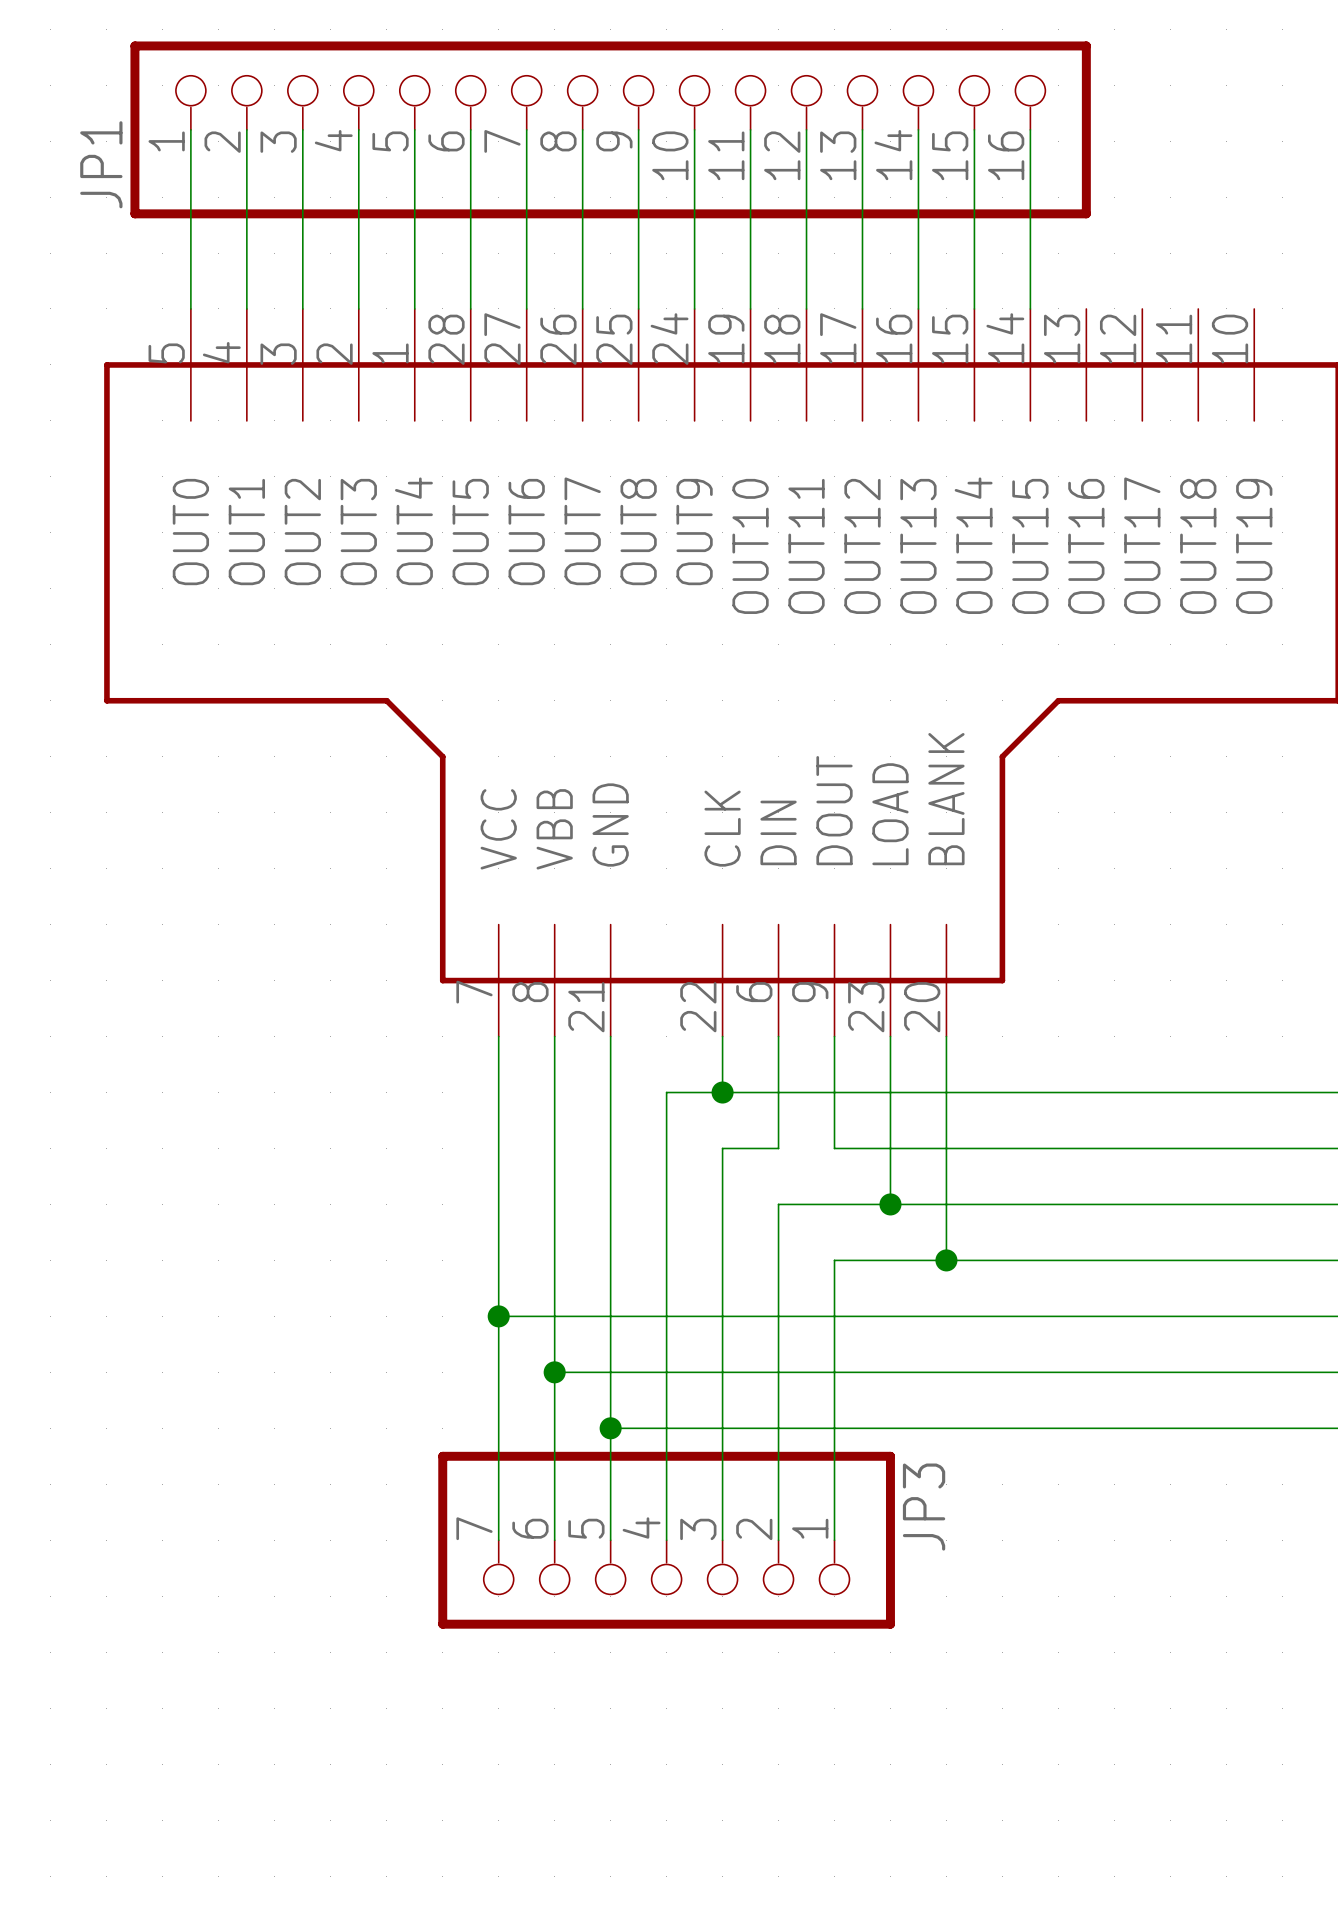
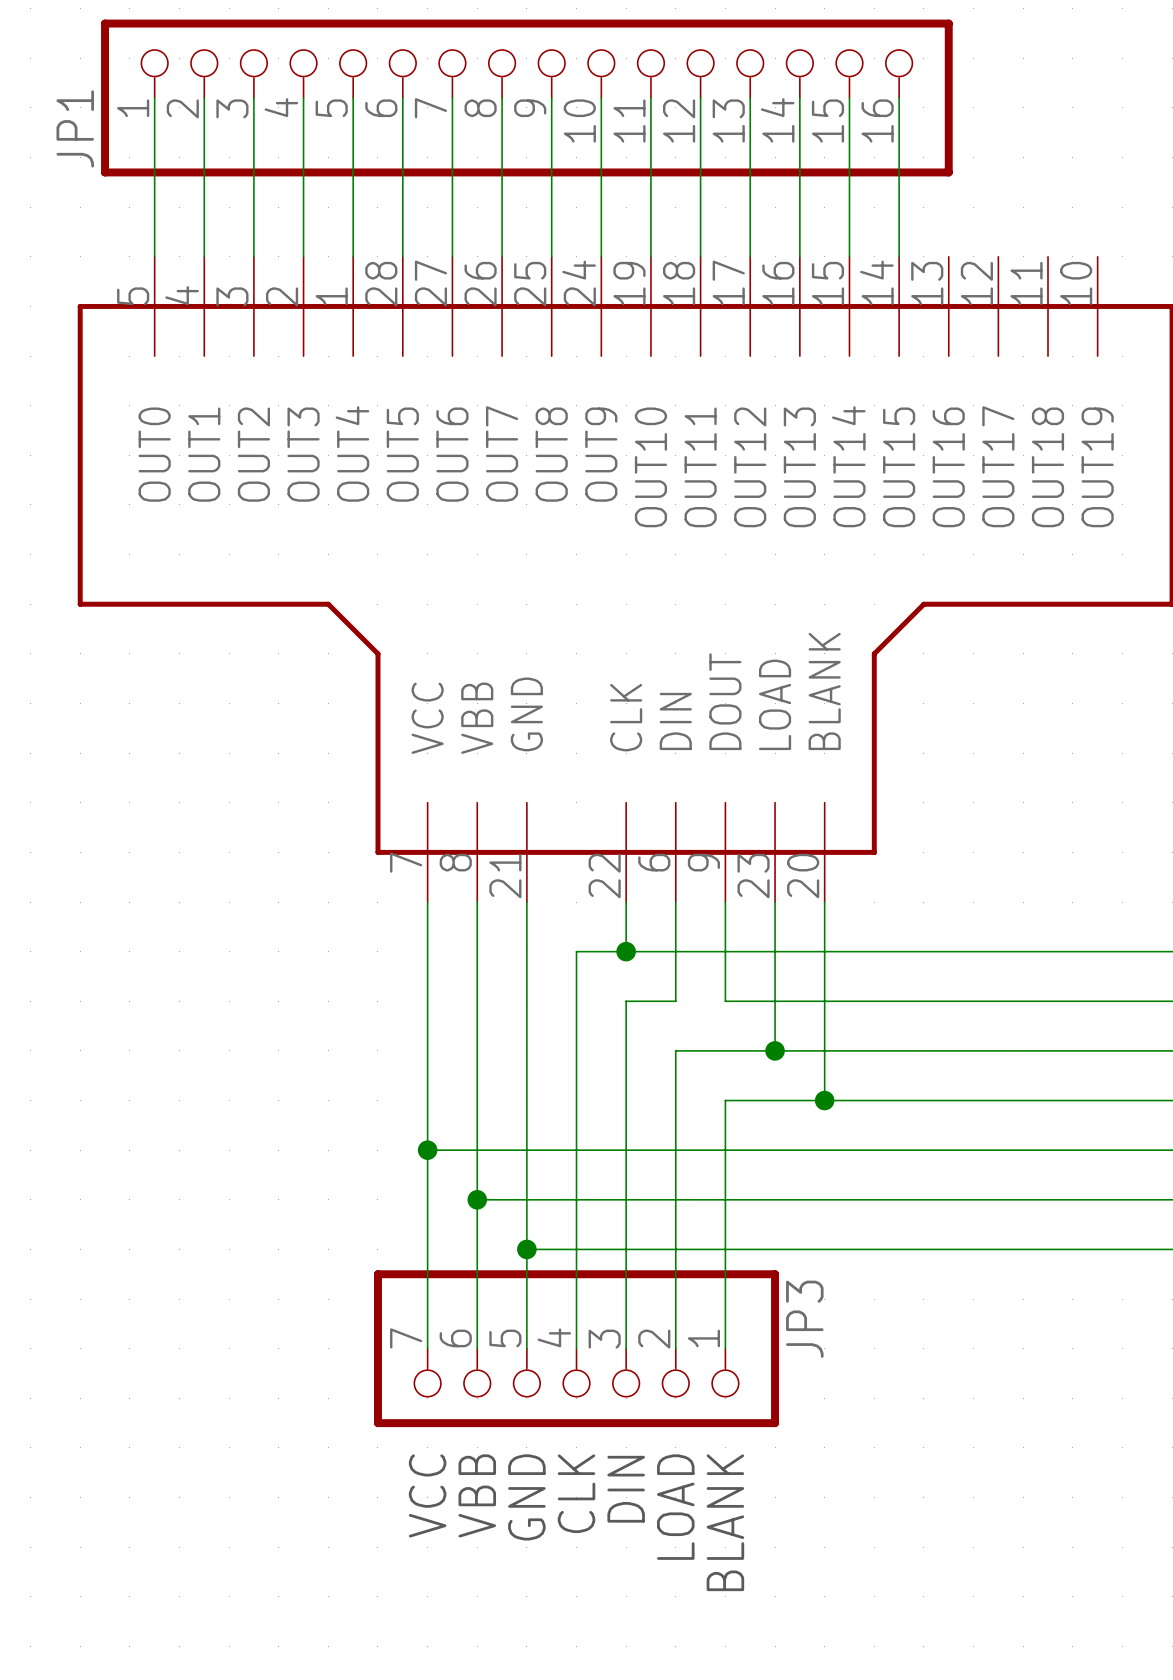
text: none -> DIN (626, 1489)
text: none -> CLK (576, 1493)
text: none -> VCC (427, 1495)
text: none -> VBB (477, 1495)
text: none -> GND (526, 1497)
text: none -> LOAD (675, 1507)
text: none -> BLANK (725, 1522)

